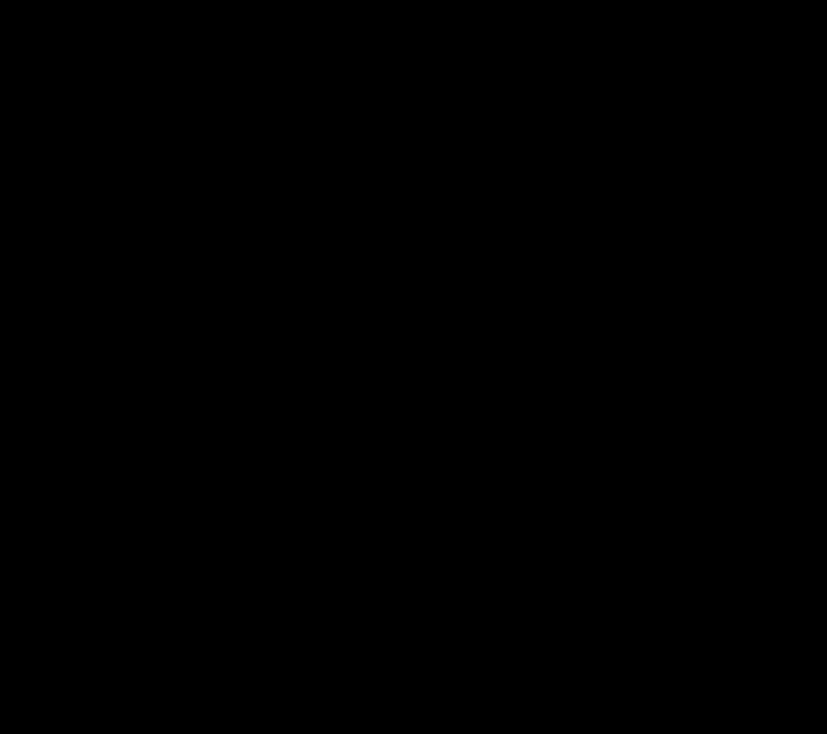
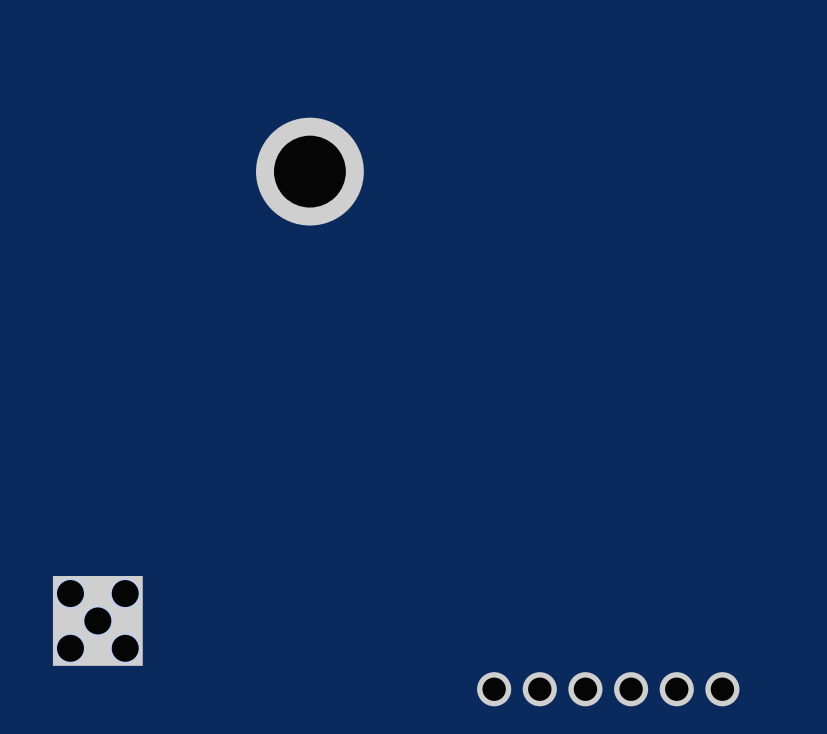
part: none -> (309, 171)
part: none -> (97, 620)
part: none -> (608, 689)

